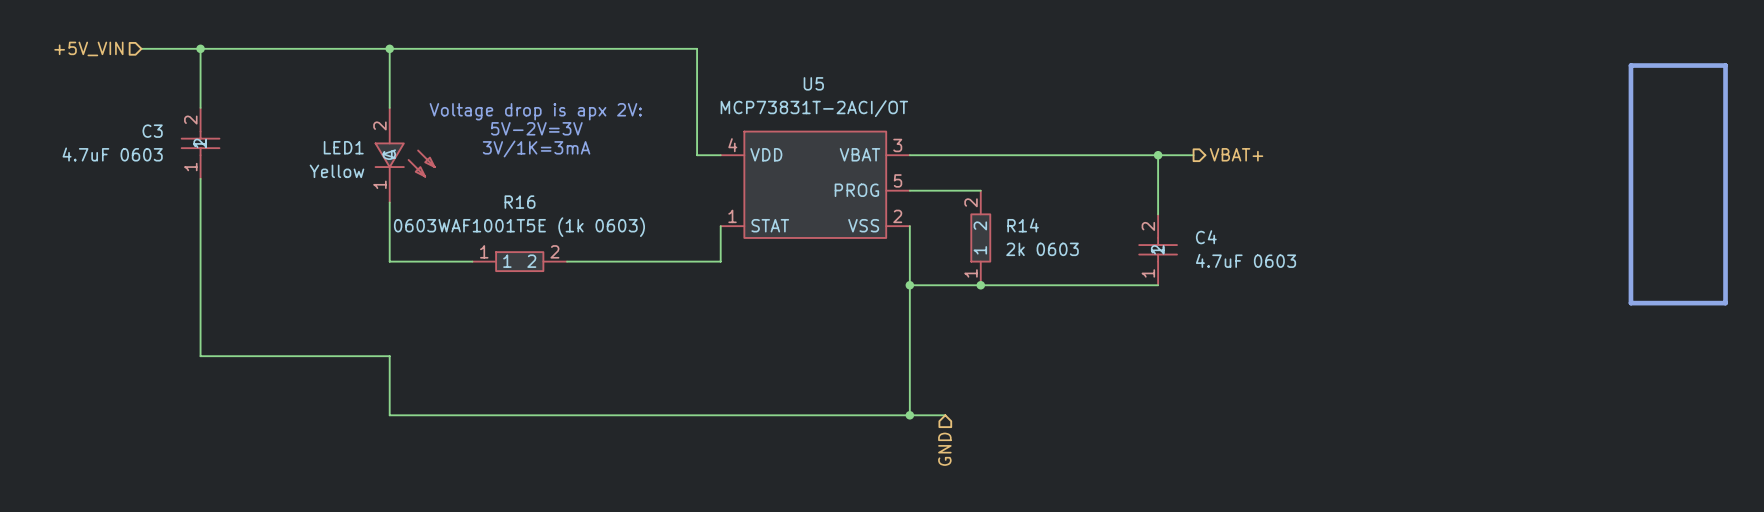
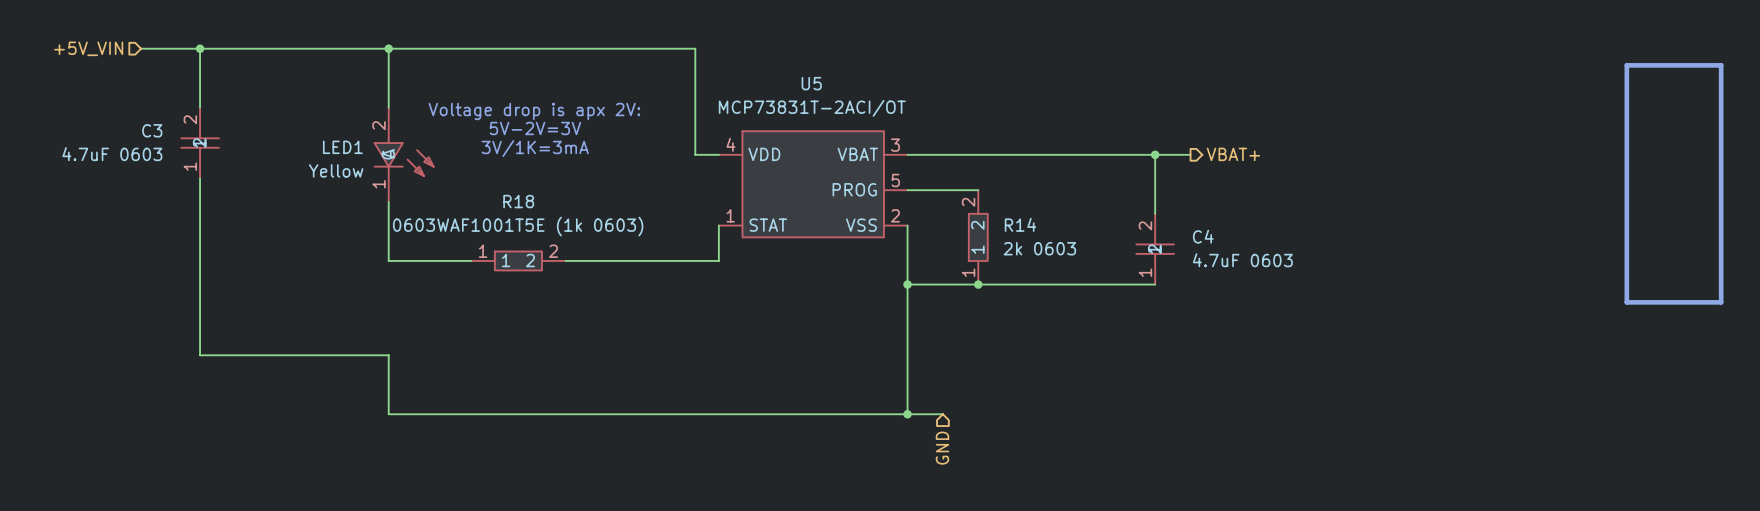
R16 name: R16 (520, 202) -> R18 (518, 201)

